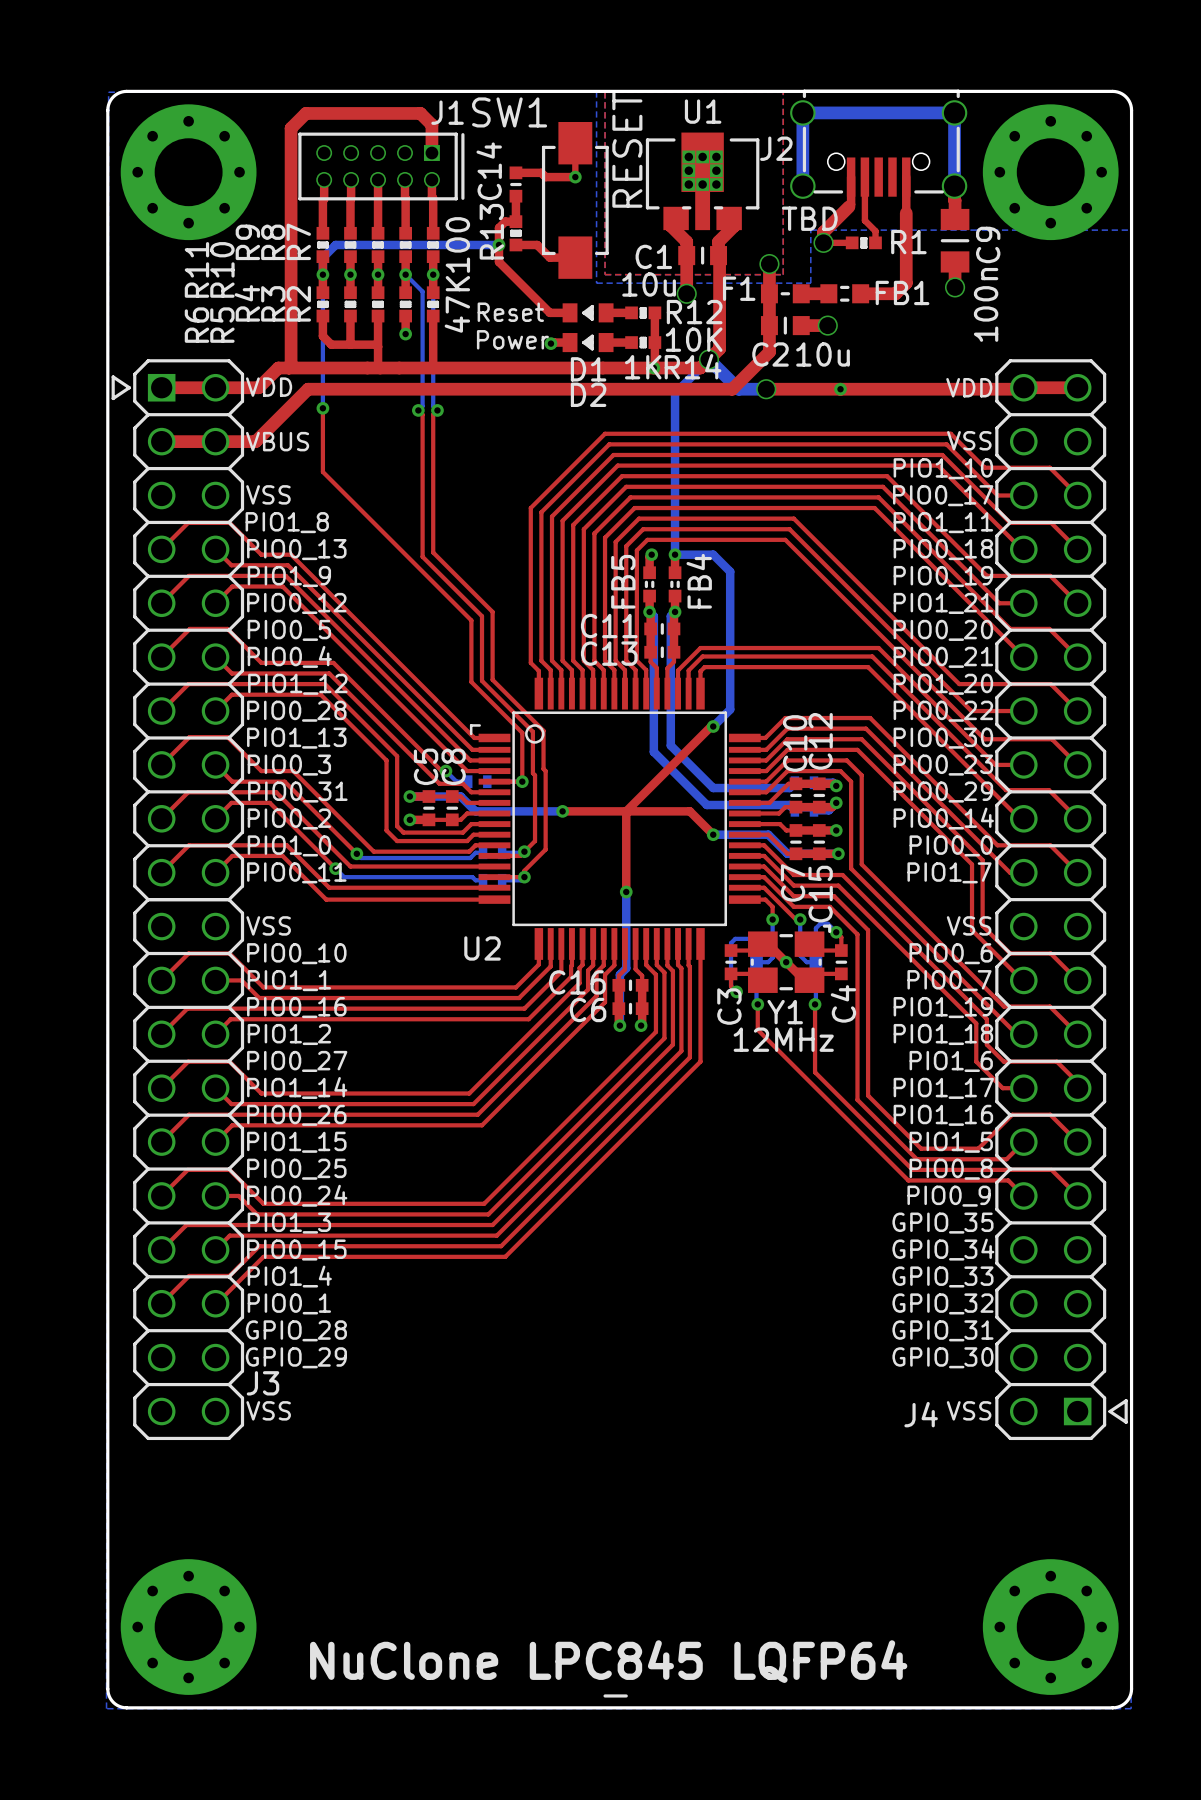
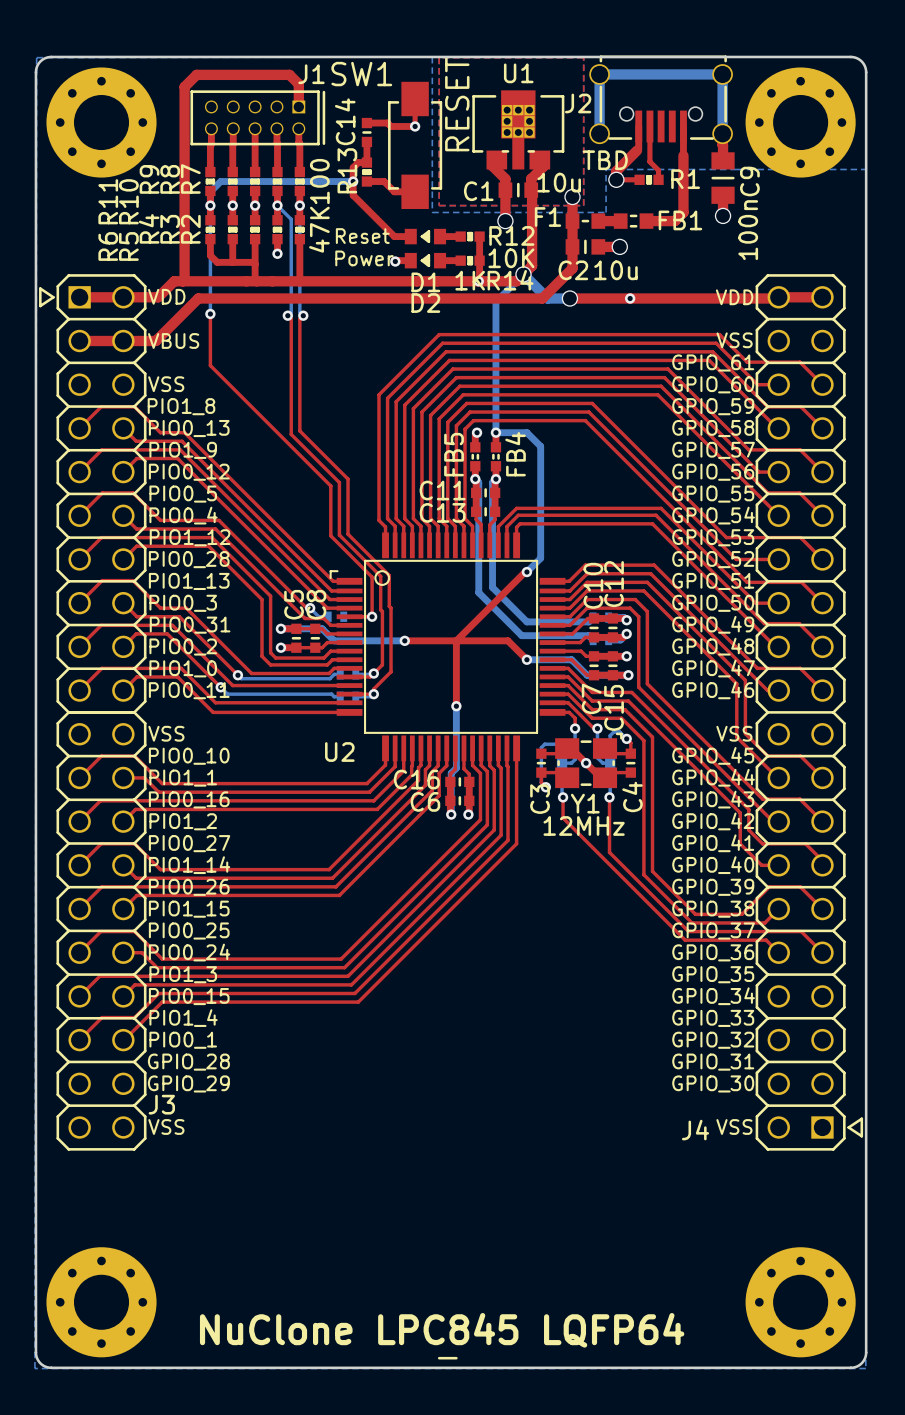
C1 value position: 10u (649, 284) -> 10u (559, 182)
J4 footprint: [995, 359, 1128, 1441] -> [755, 274, 864, 1151]

